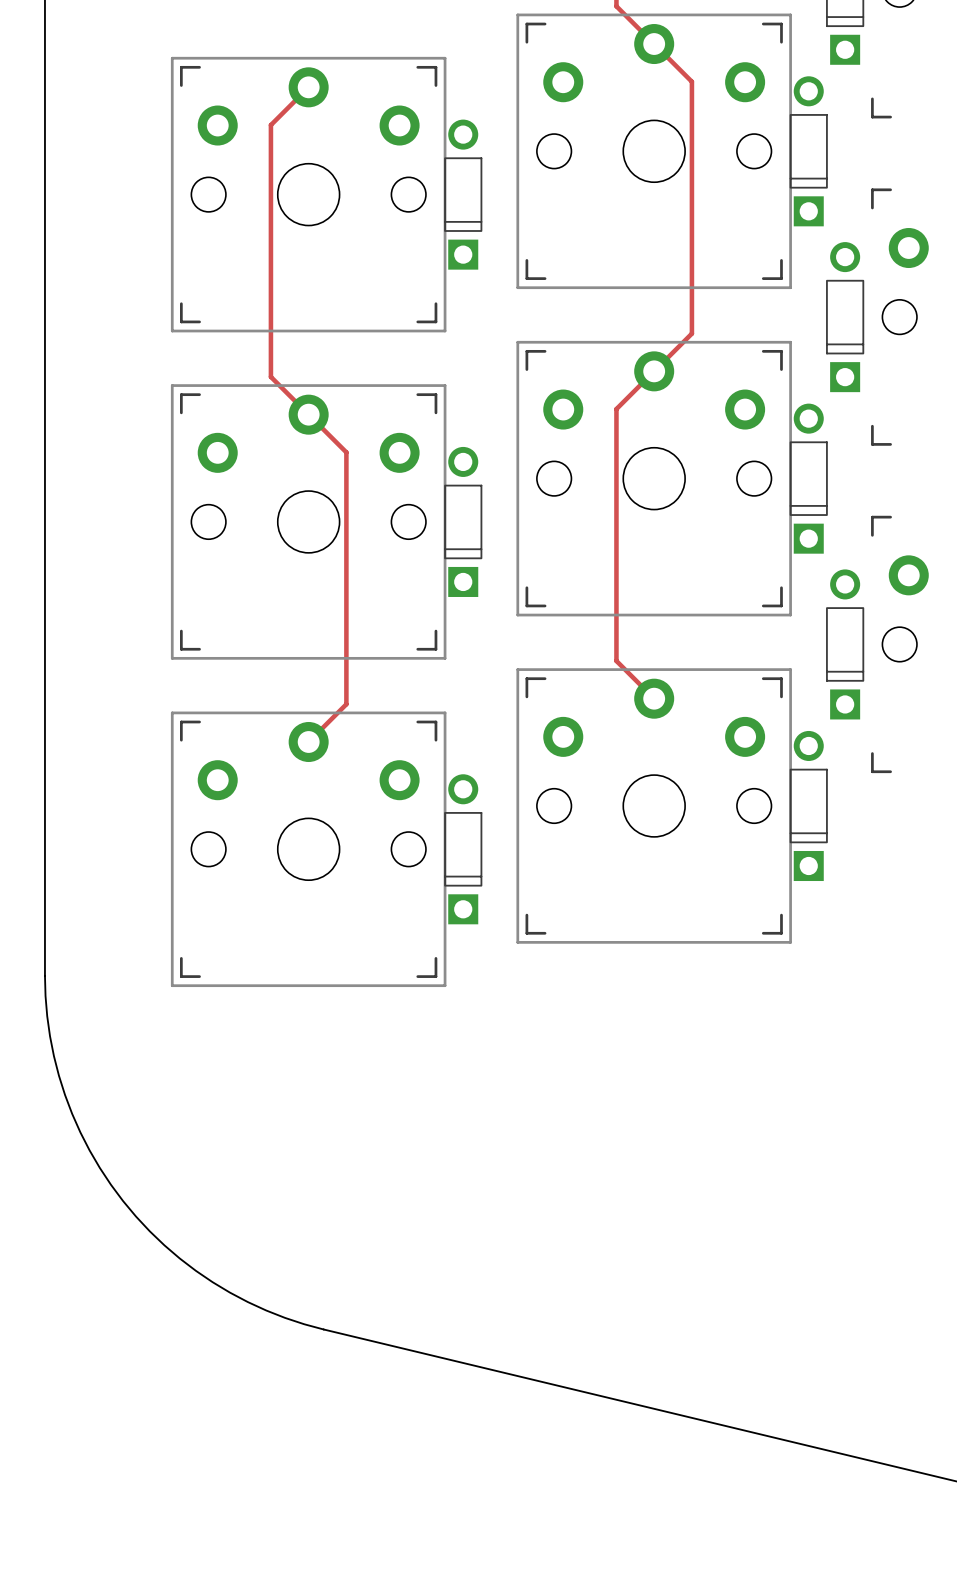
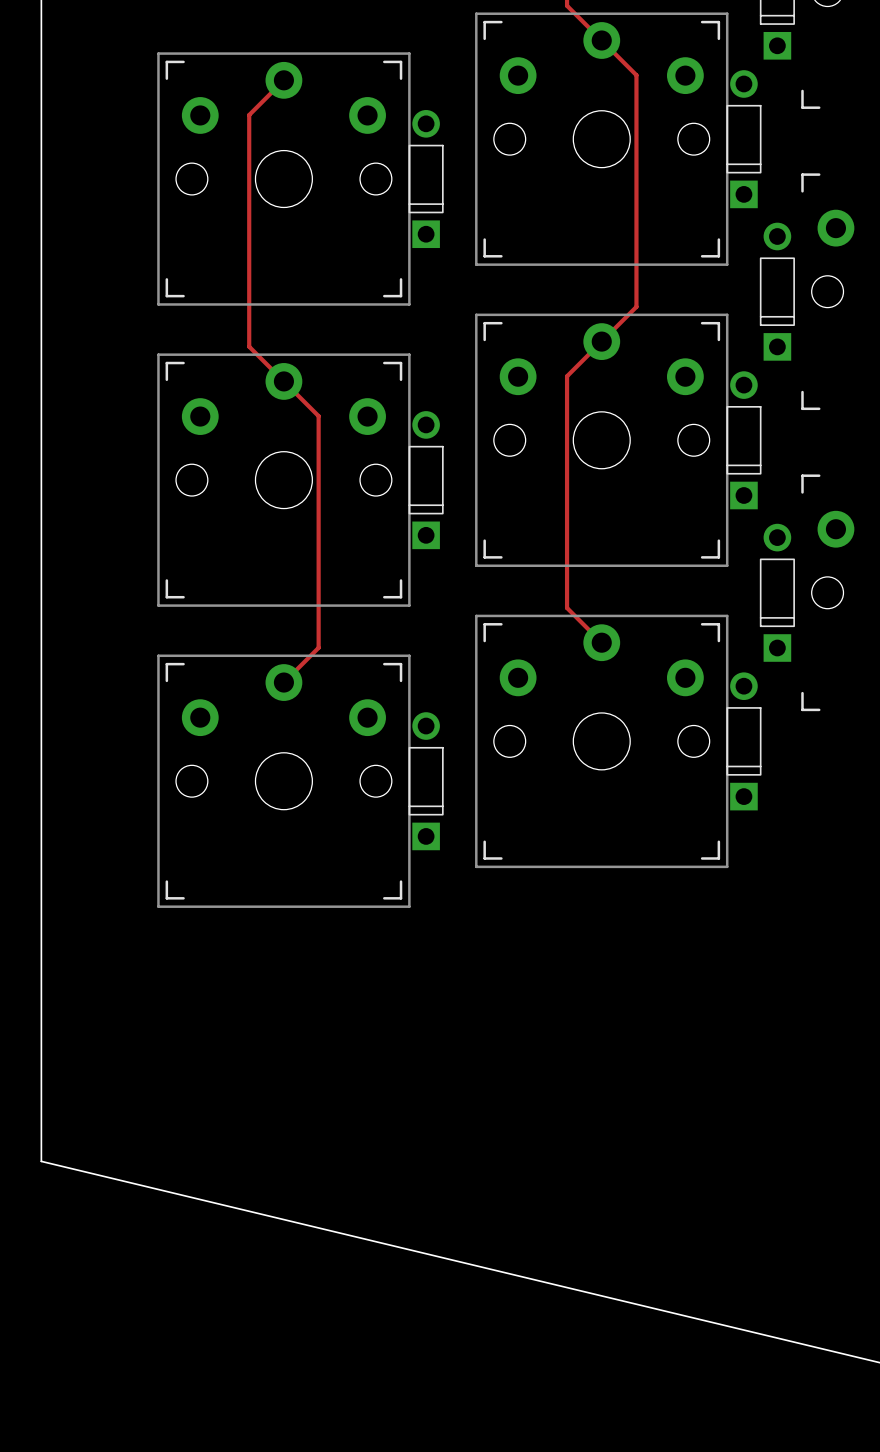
board edge: (44, 975) (50, 1036) (65, 1095) (89, 1150) (123, 1201) (164, 1245) (212, 1282) (266, 1310) (323, 1329) -> (41, 897) (41, 1161) (297, 1222)

